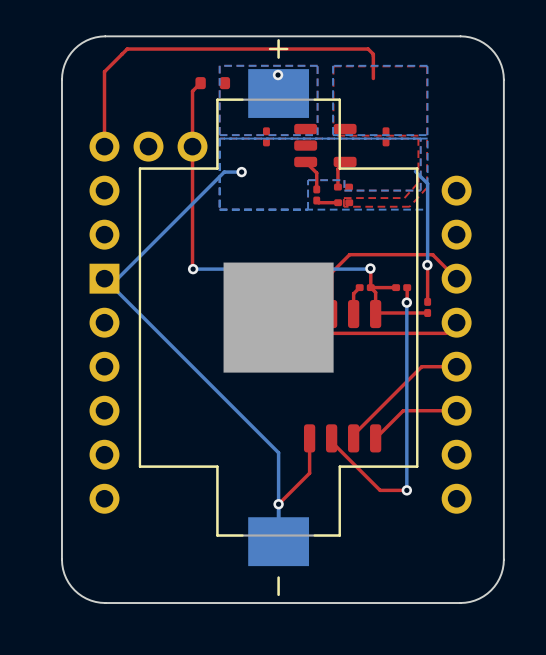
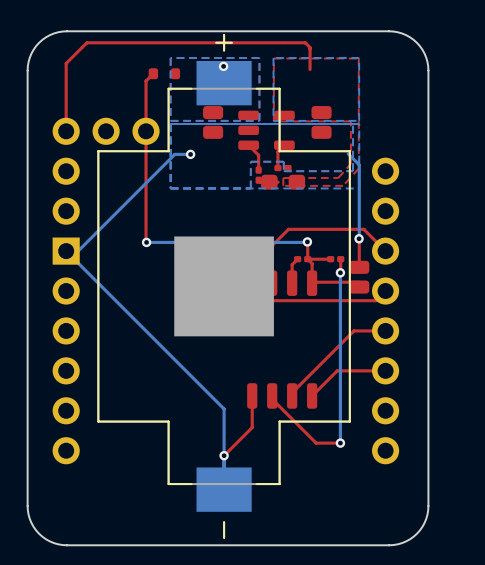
part footprint: [263, 127, 270, 147] -> [203, 106, 224, 139]
part footprint: [382, 127, 390, 147] -> [311, 106, 332, 139]
part footprint: [334, 199, 354, 207] -> [261, 174, 306, 190]
part footprint: [424, 297, 432, 317] -> [349, 260, 370, 294]

